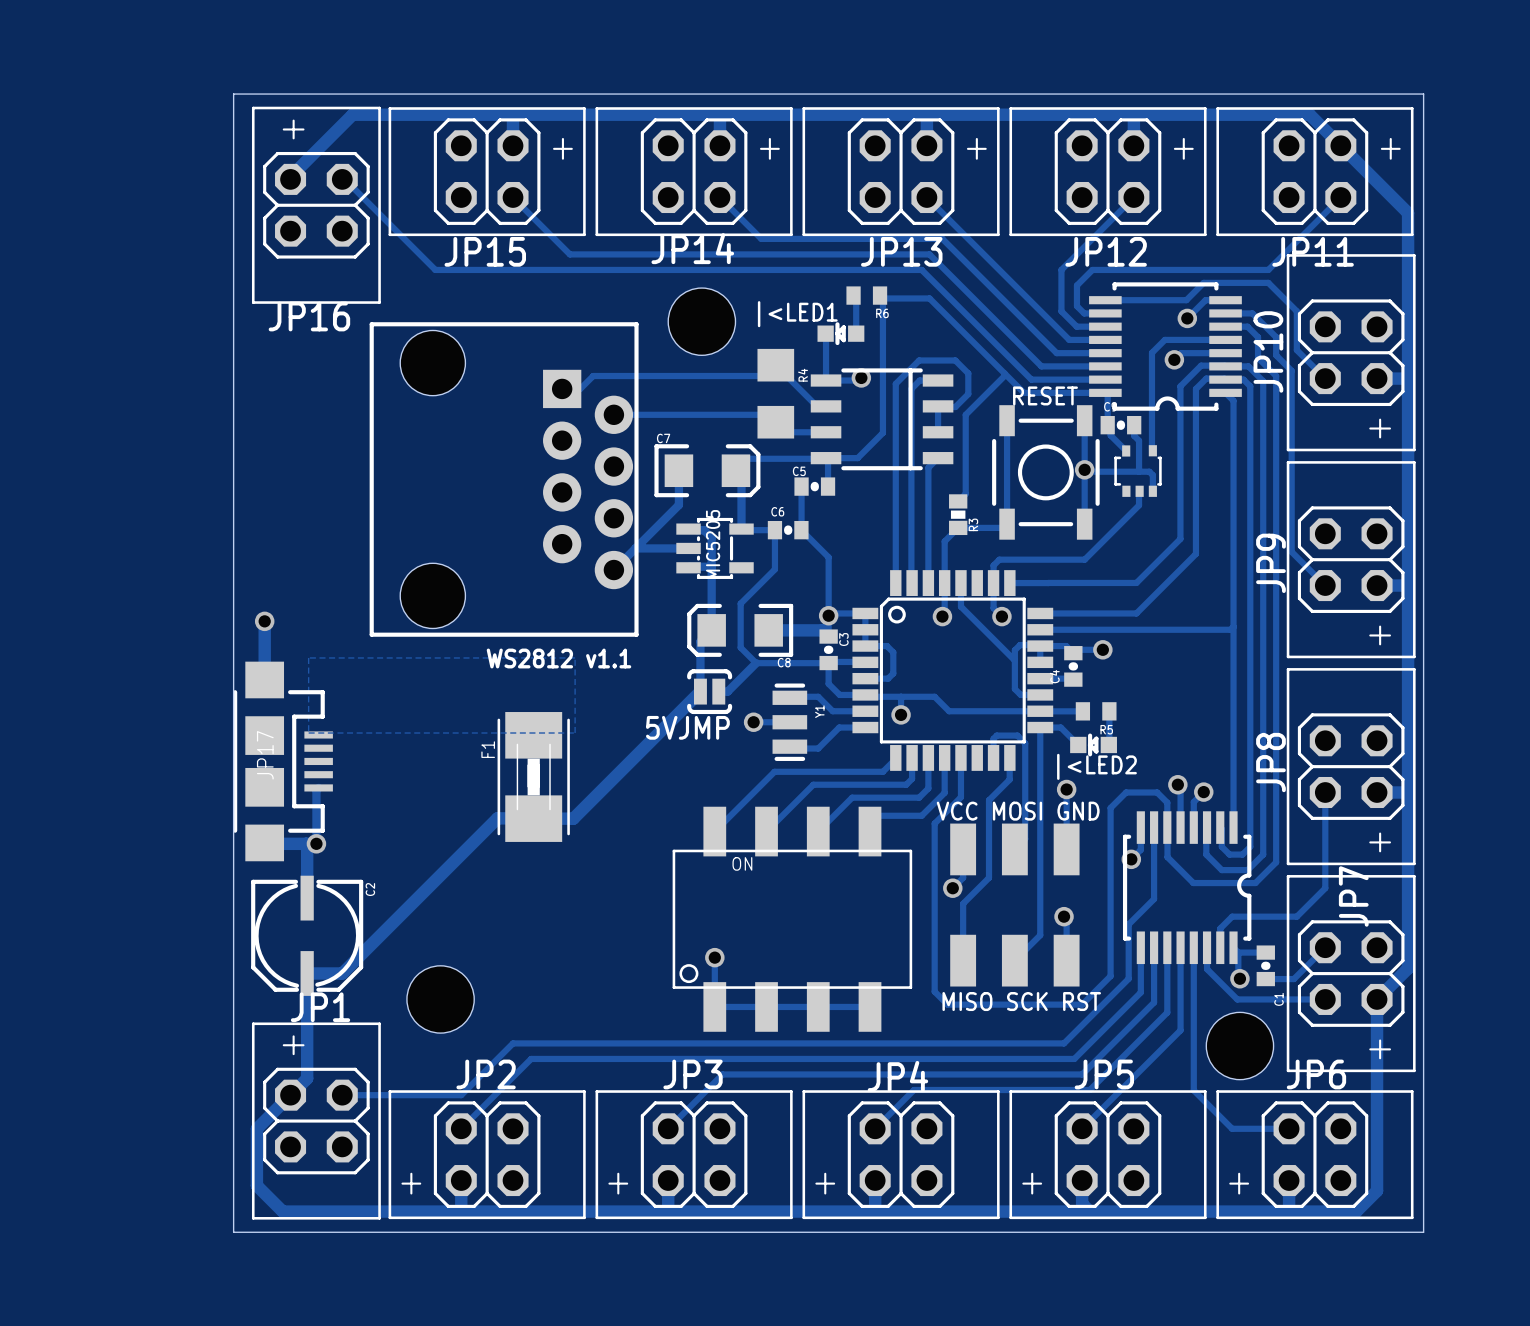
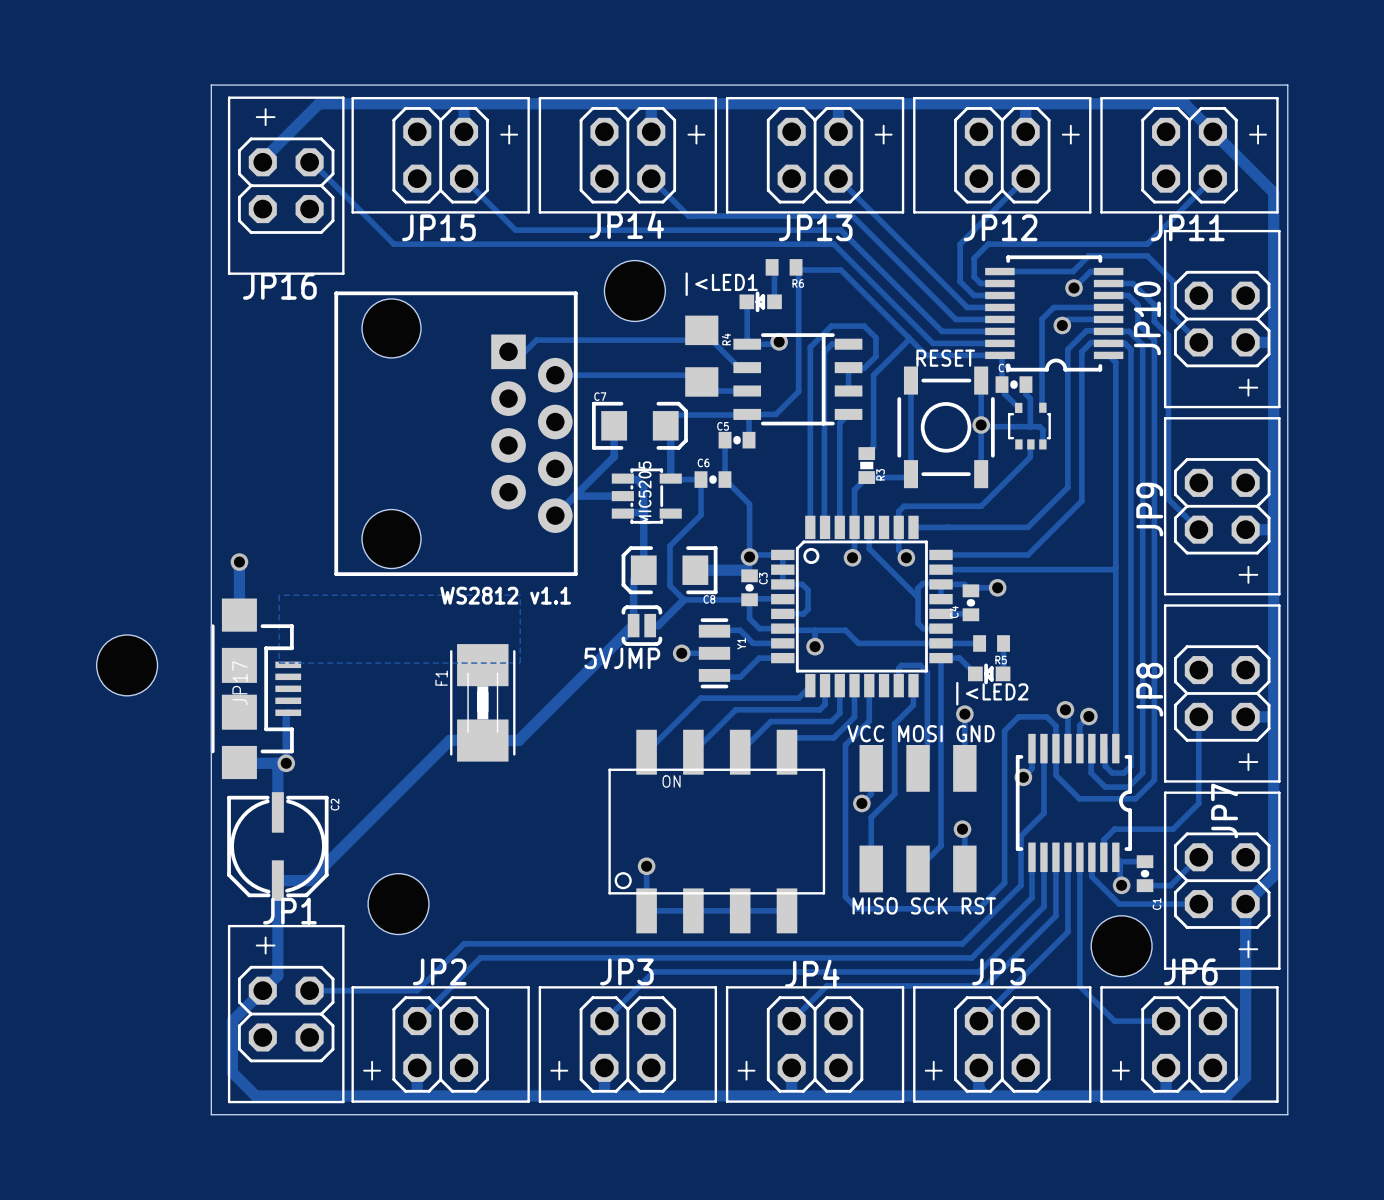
part: none -> (127, 665)

